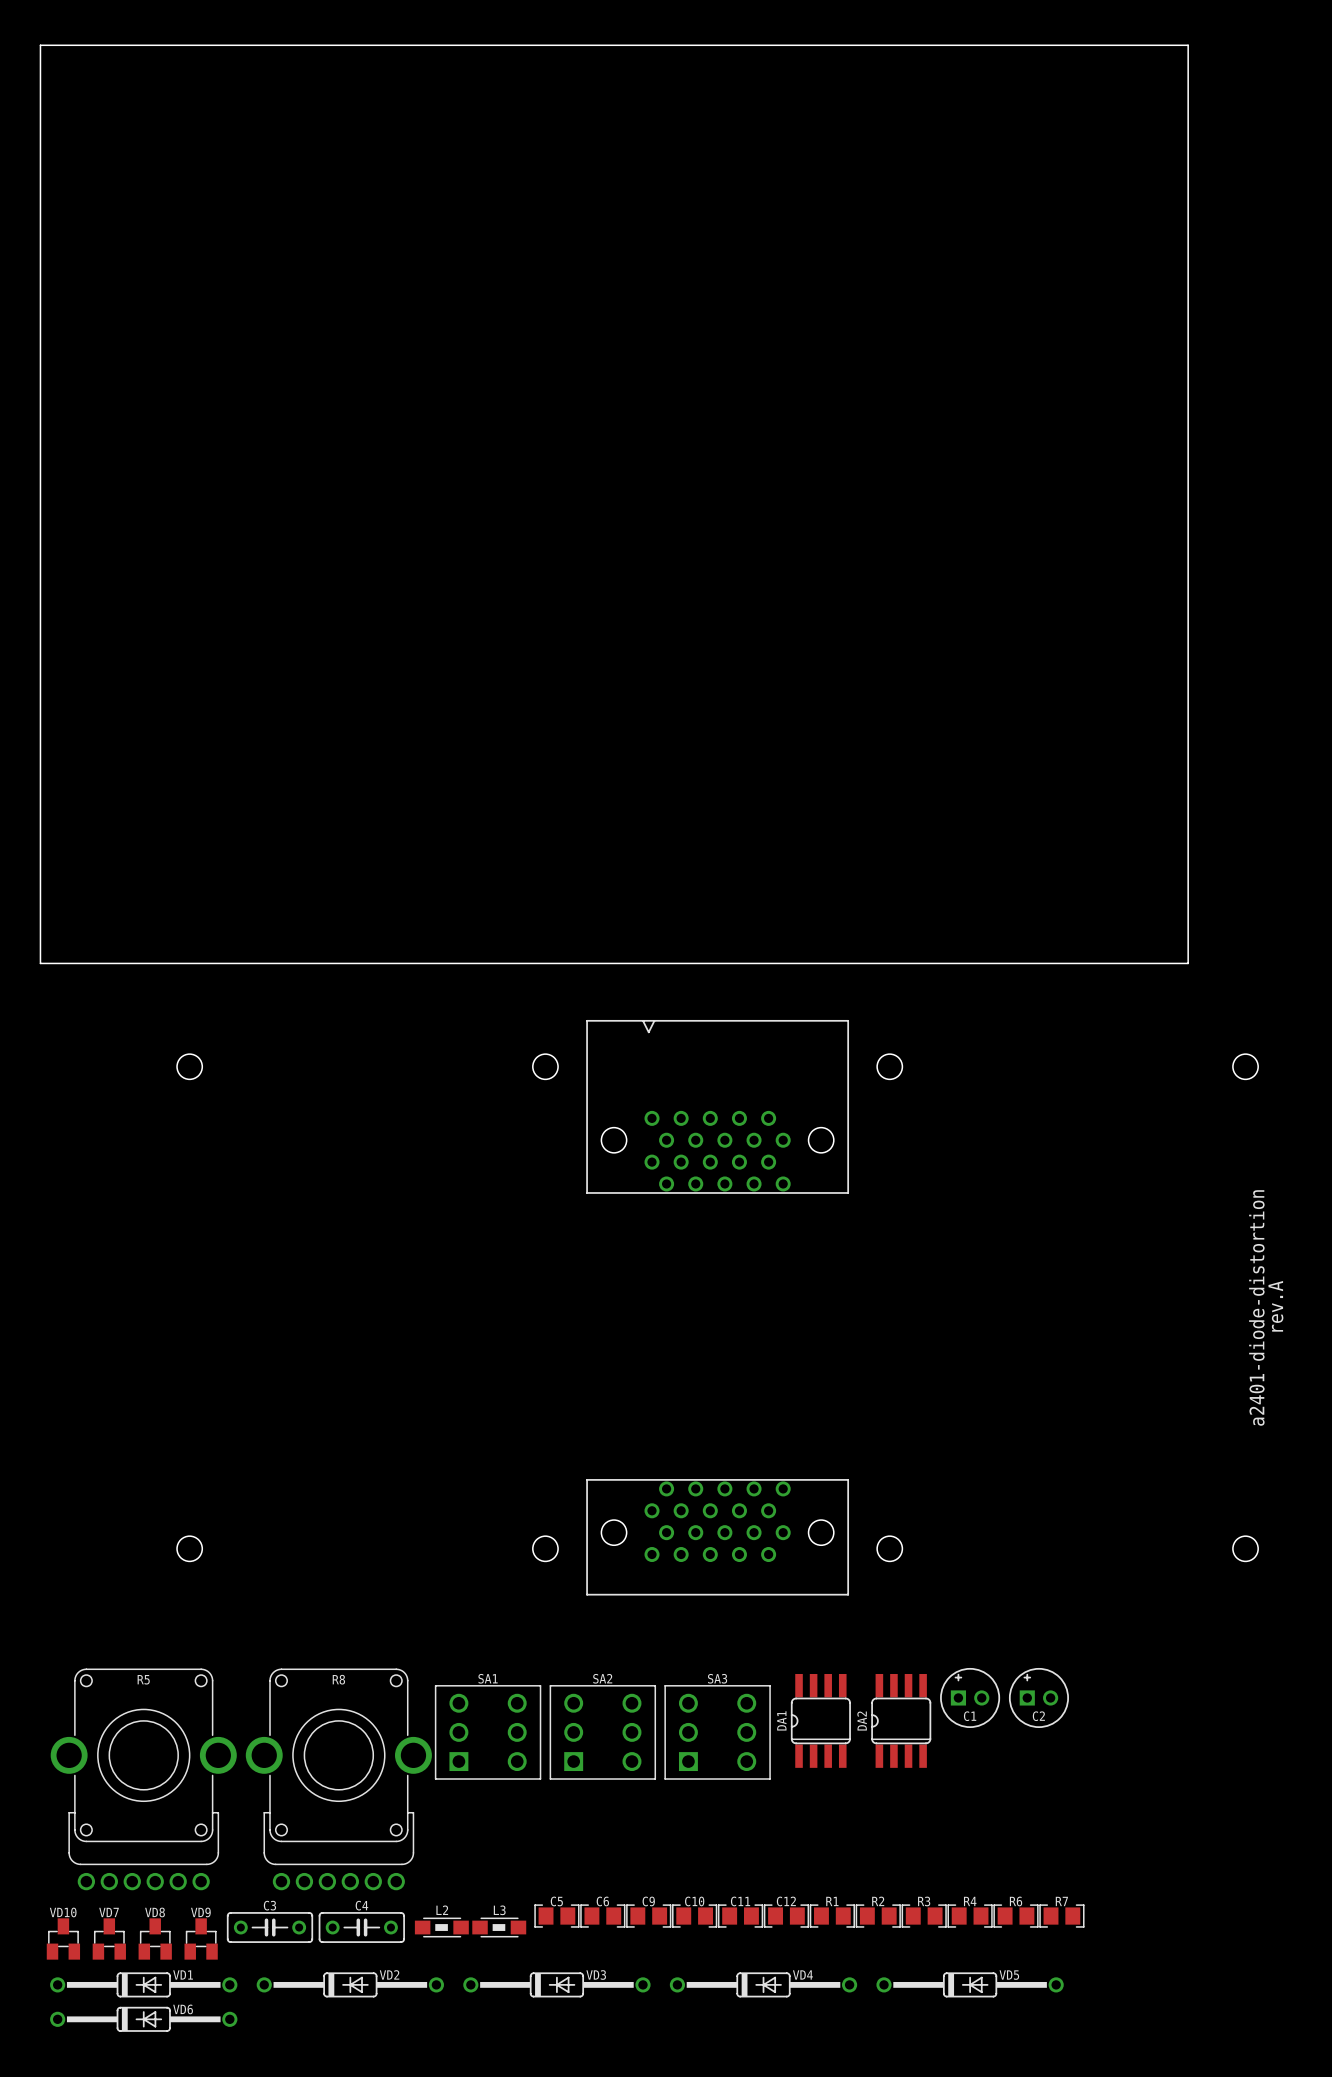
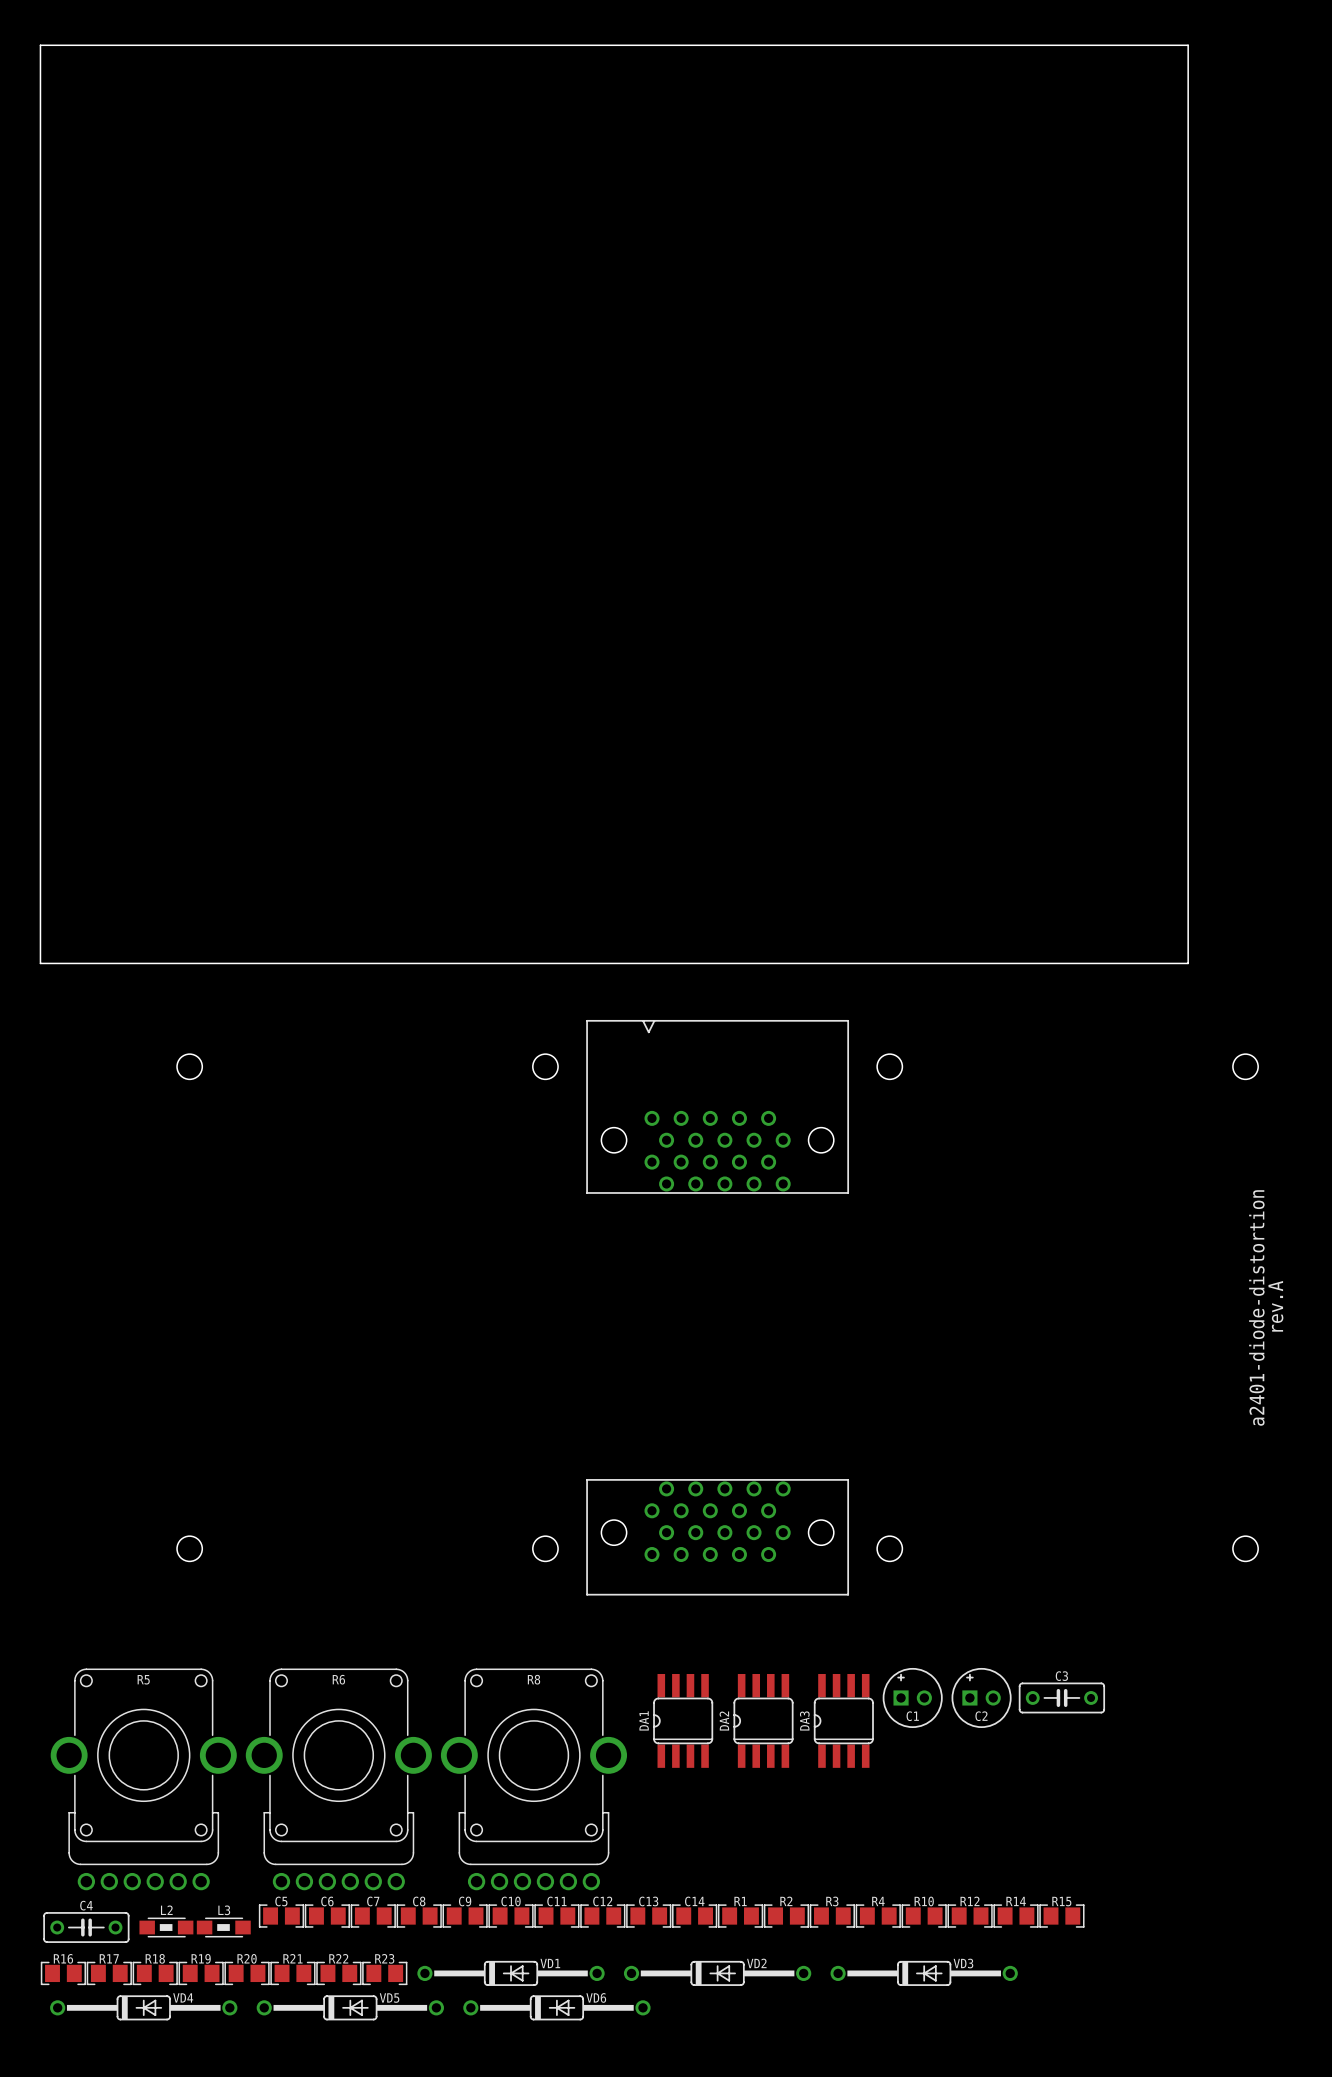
R8 name: R8 (338, 1679) -> R6 (338, 1679)
C1 position: (970, 1697) -> (912, 1697)
C2 position: (1038, 1697) -> (981, 1697)
DA1 position: (820, 1720) -> (683, 1720)
DA3: none -> (843, 1720)
DA2 position: (901, 1720) -> (763, 1720)
SA1: (488, 1732) -> none
SA2: (602, 1732) -> none
SA3: (717, 1732) -> none
R8: none -> (533, 1779)
C5 name: C5 (556, 1901) -> C11 (556, 1901)
C6 name: C6 (602, 1901) -> C12 (602, 1901)
C9 name: C9 (648, 1901) -> C13 (648, 1901)
C10 name: C10 (694, 1901) -> C14 (694, 1901)
C11 name: C11 (740, 1901) -> R1 (740, 1901)
C12 name: C12 (786, 1901) -> R2 (786, 1901)
R1 name: R1 (832, 1901) -> R3 (832, 1901)
R2 name: R2 (878, 1901) -> R4 (878, 1901)
R3 name: R3 (924, 1901) -> R10 (924, 1901)
R4 name: R4 (970, 1901) -> R12 (970, 1901)
R6 name: R6 (1016, 1901) -> R14 (1016, 1901)
R7 name: R7 (1061, 1901) -> R15 (1061, 1901)
C5: none -> (281, 1916)
C6: none -> (327, 1916)
C7: none -> (373, 1916)
C8: none -> (419, 1916)
C9: none -> (465, 1916)
C10: none -> (511, 1916)
C3 position: (269, 1927) -> (1061, 1697)
C4 position: (361, 1927) -> (86, 1927)
L2 position: (441, 1927) -> (166, 1927)
L3 position: (499, 1927) -> (223, 1927)
VD10: (63, 1938) -> none
VD7: (109, 1938) -> none
VD8: (155, 1938) -> none
VD9: (201, 1938) -> none
R16: none -> (63, 1973)
R17: none -> (109, 1973)
R18: none -> (155, 1973)
R19: none -> (201, 1973)
R20: none -> (247, 1973)
R21: none -> (292, 1973)
R22: none -> (338, 1973)
R23: none -> (384, 1973)
VD1 position: (143, 1984) -> (511, 1973)
VD2 position: (350, 1984) -> (717, 1973)
VD3 position: (556, 1984) -> (924, 1973)
VD4 position: (763, 1984) -> (143, 2007)
VD5 position: (970, 1984) -> (350, 2007)
VD6 position: (143, 2019) -> (556, 2007)

